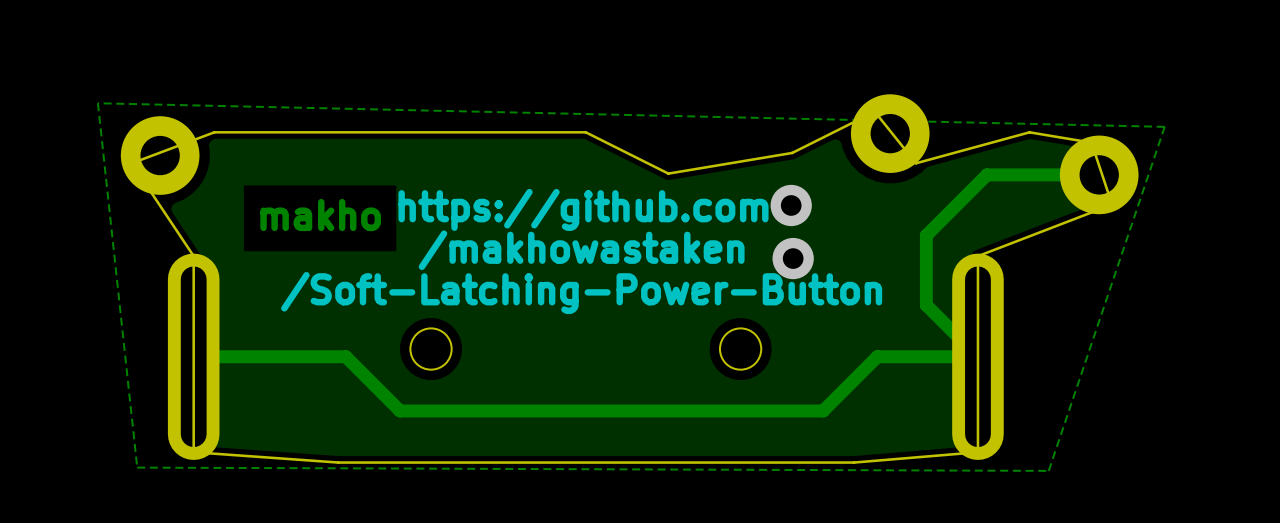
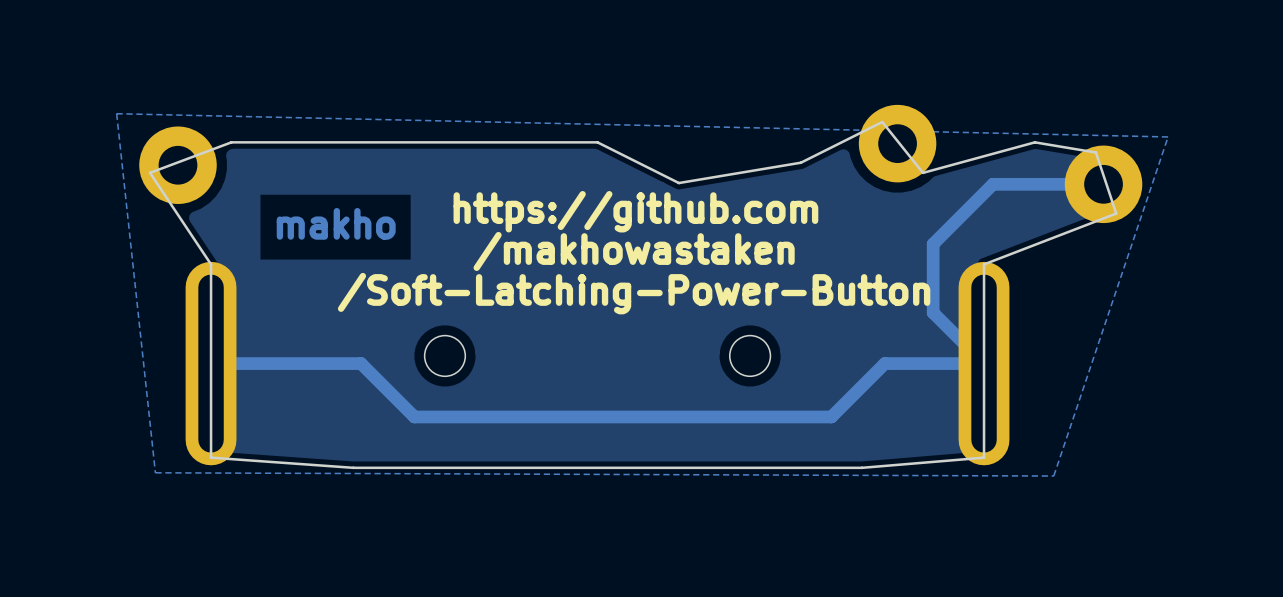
via: (791, 205) -> none
text position: https://github.com (583, 209) -> https://github.com (635, 211)
text position: /makhowastaken (581, 250) -> /makhowastaken (634, 251)
via: (793, 258) -> none
text position: /Soft-Latching-Power-Button (581, 292) -> /Soft-Latching-Power-Button (634, 293)

